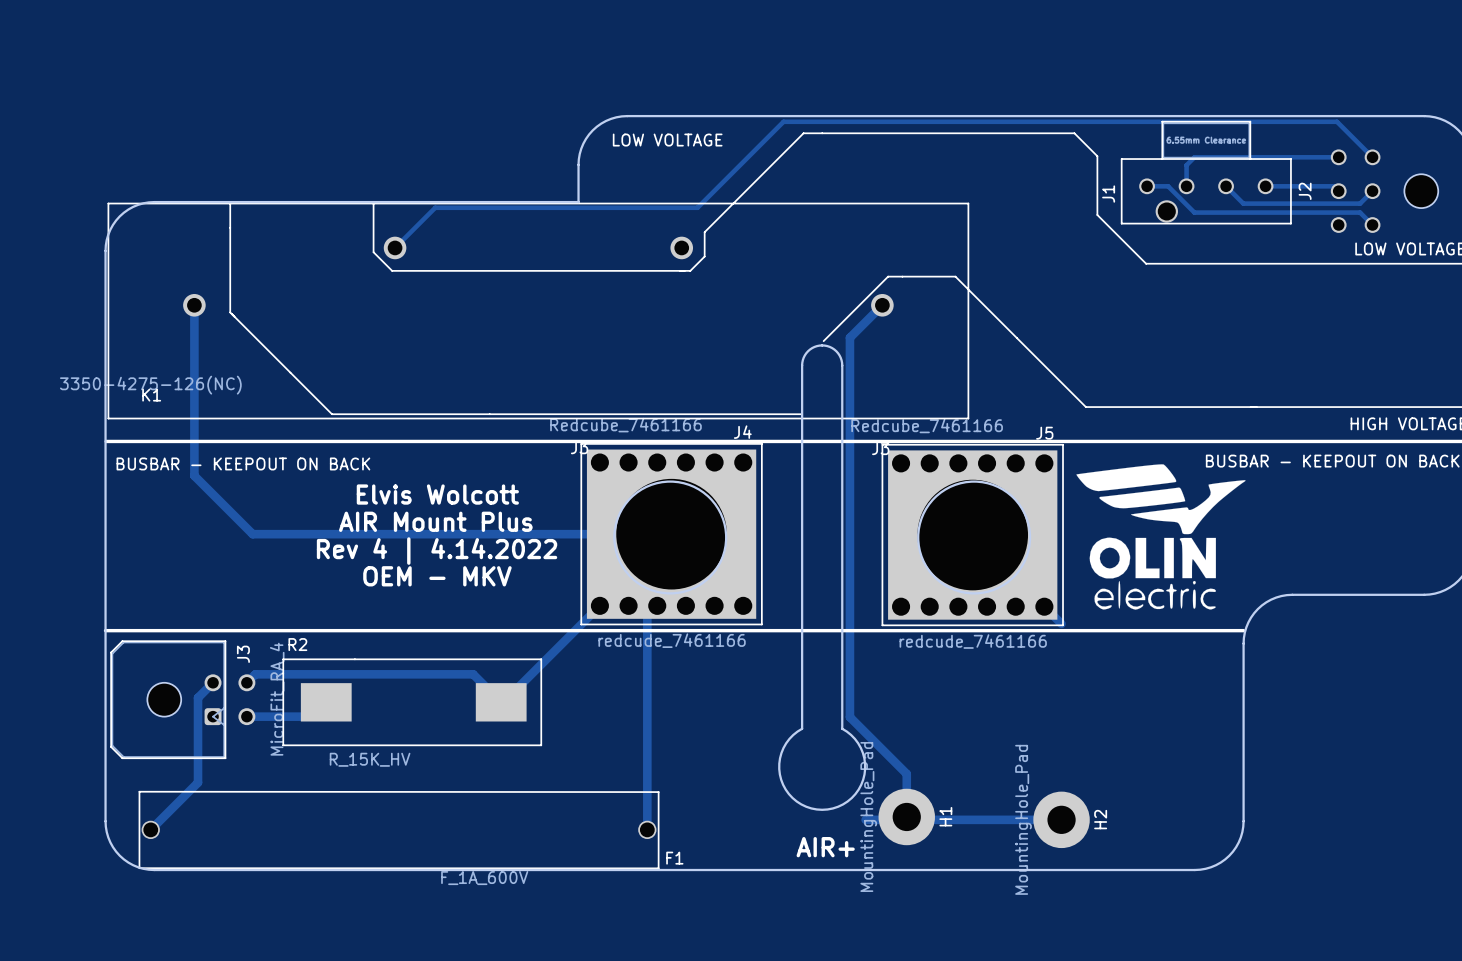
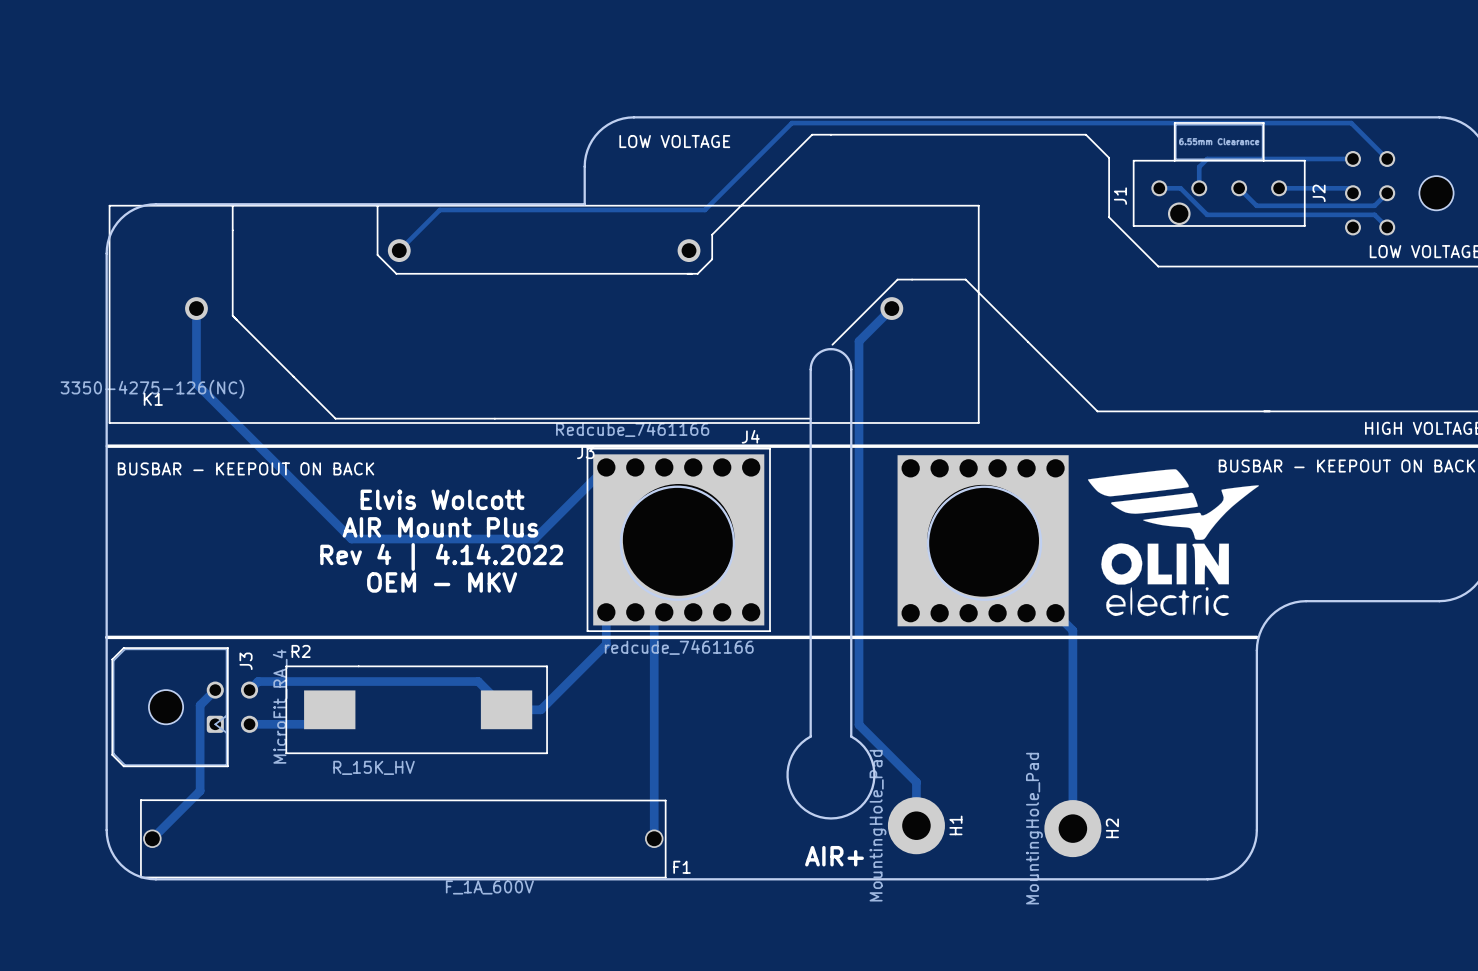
track: (194, 379) (194, 475) (252, 534) (671, 534) (503, 702) -> (196, 383) (351, 539) (534, 539) (606, 467)
J5 side: top (972, 535) -> bottom (983, 540)
track: none -> (606, 612) (606, 644) (540, 709) (508, 709)
track: (865, 819) (1061, 819) -> (1072, 630) (1072, 828)

